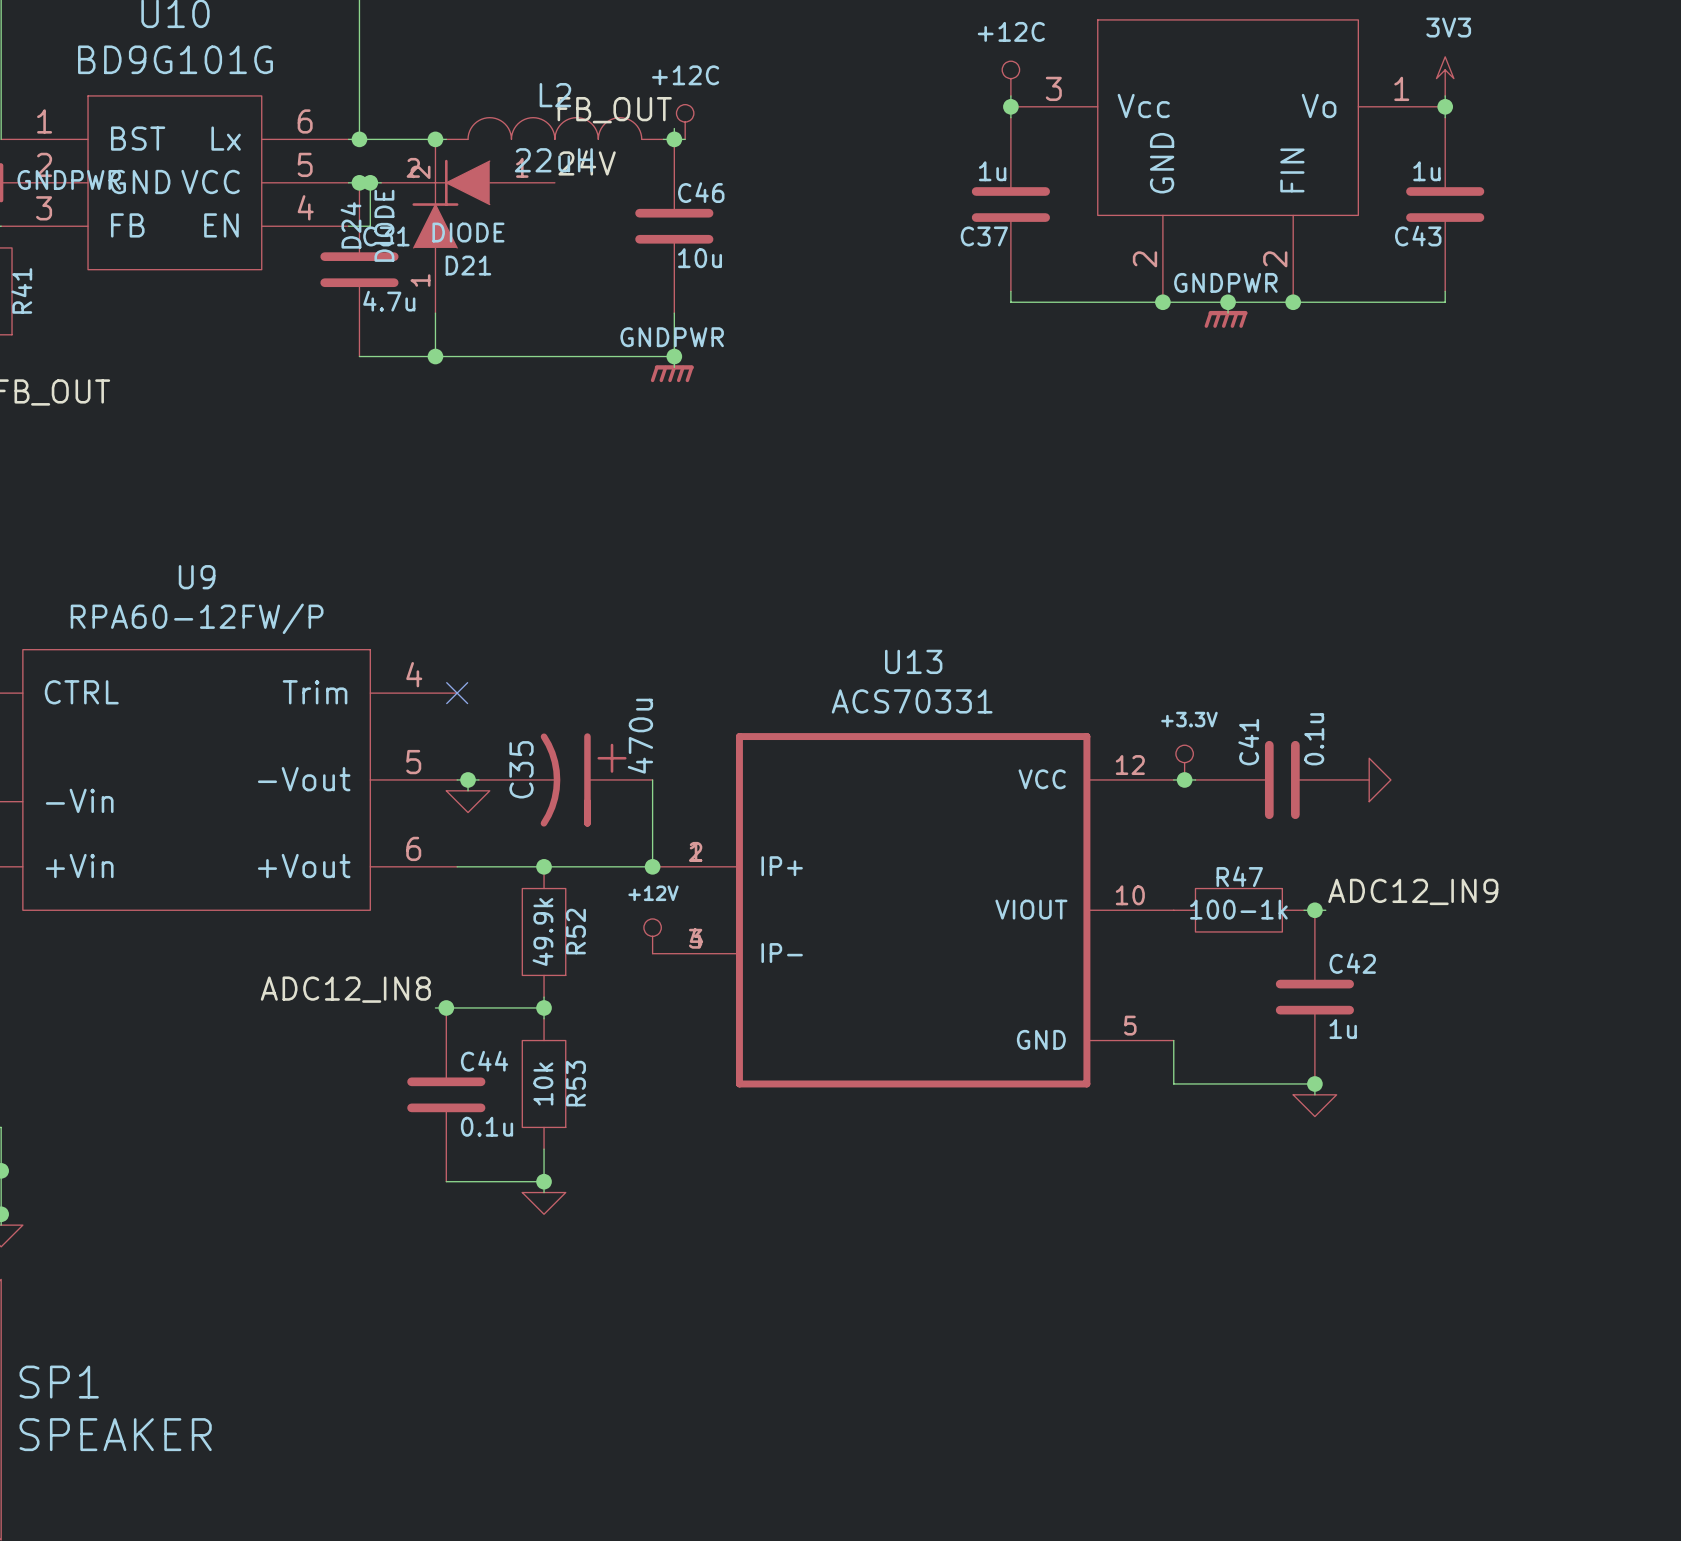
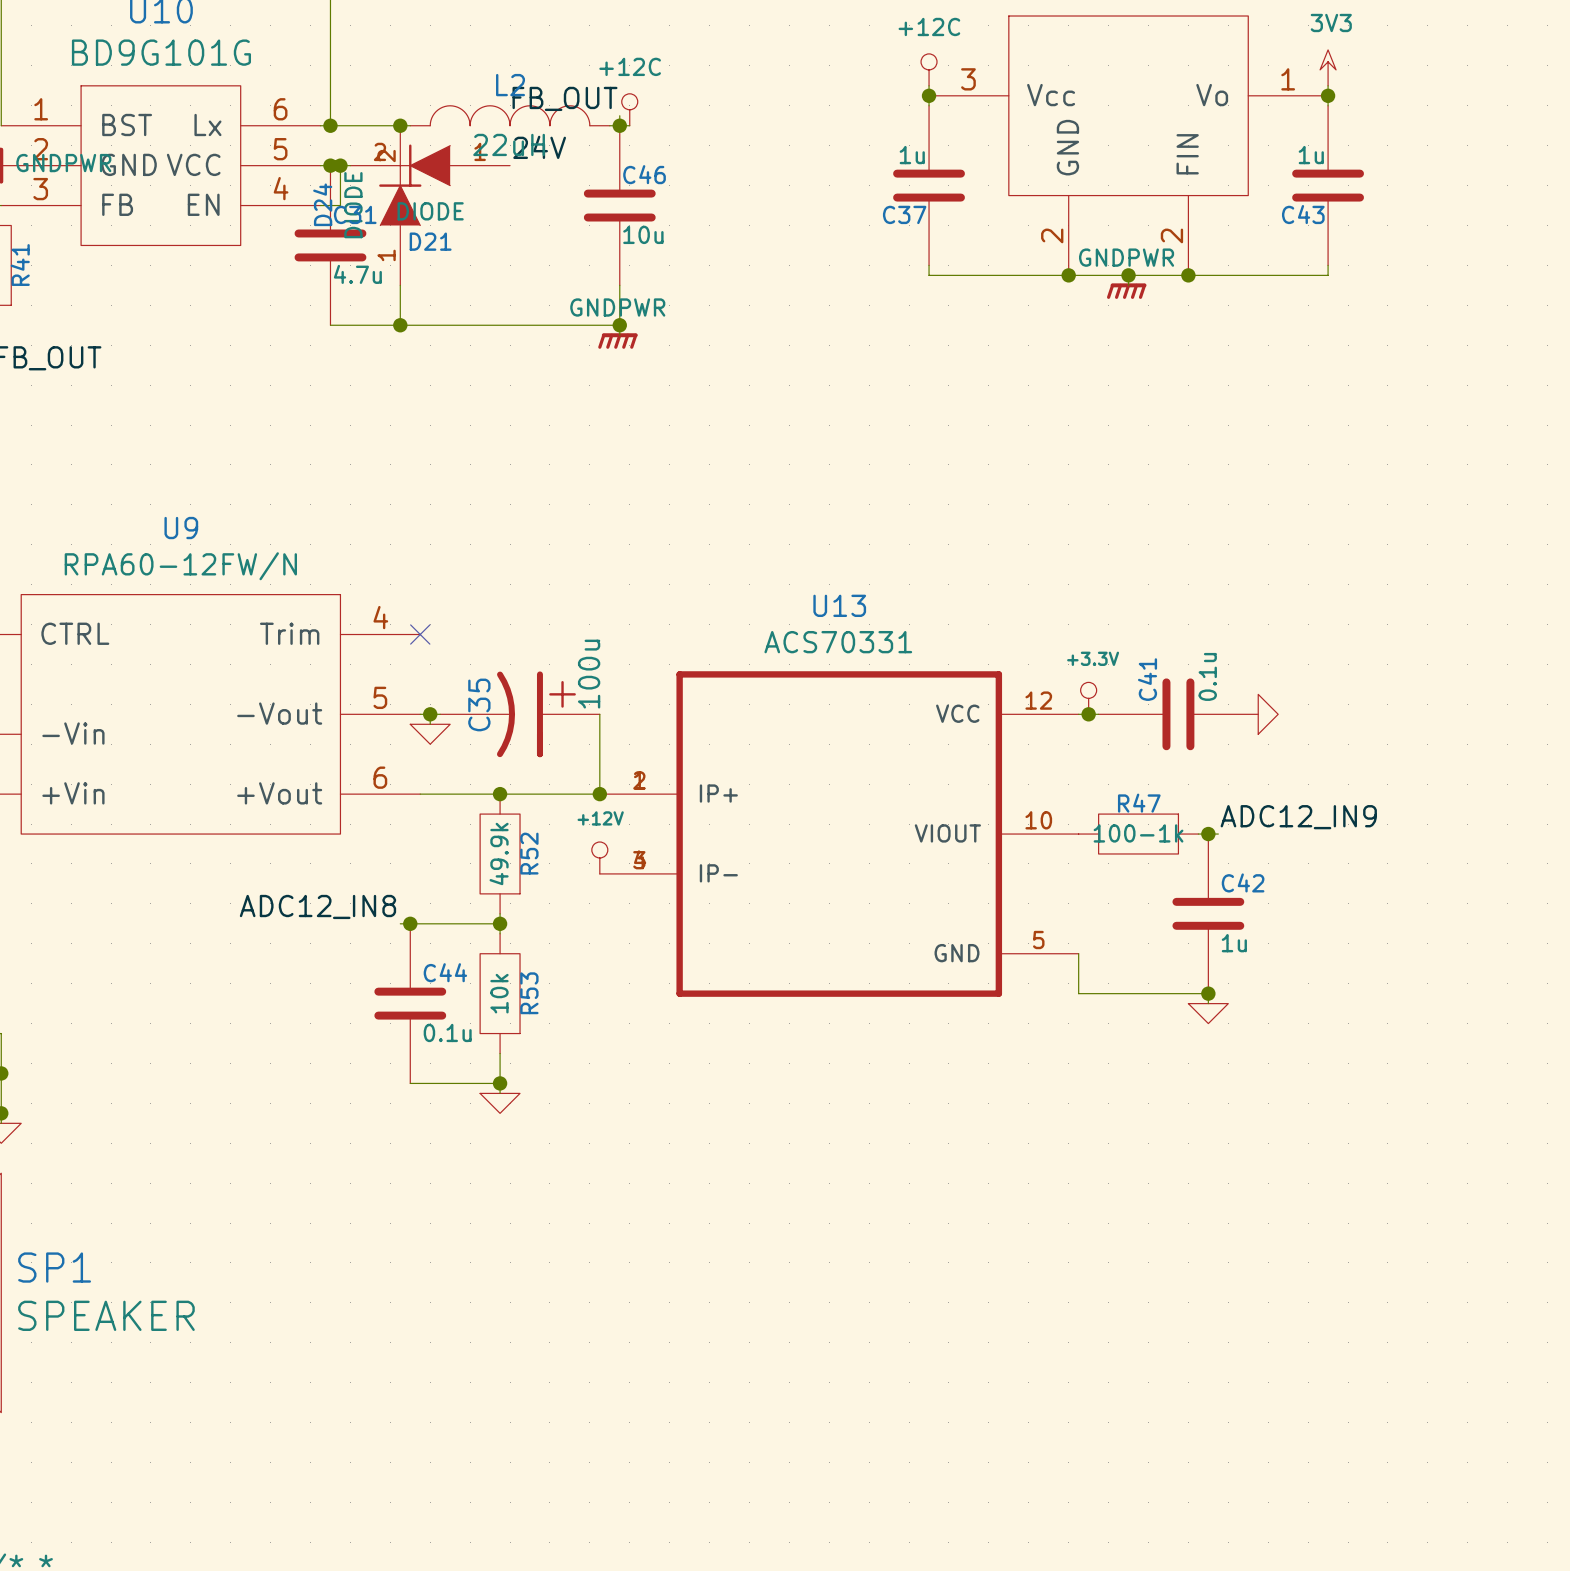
U9 value: RPA60-12FW/P (197, 618) -> RPA60-12FW/N (180, 566)
C35 value: 470u (640, 736) -> 100u (589, 674)

